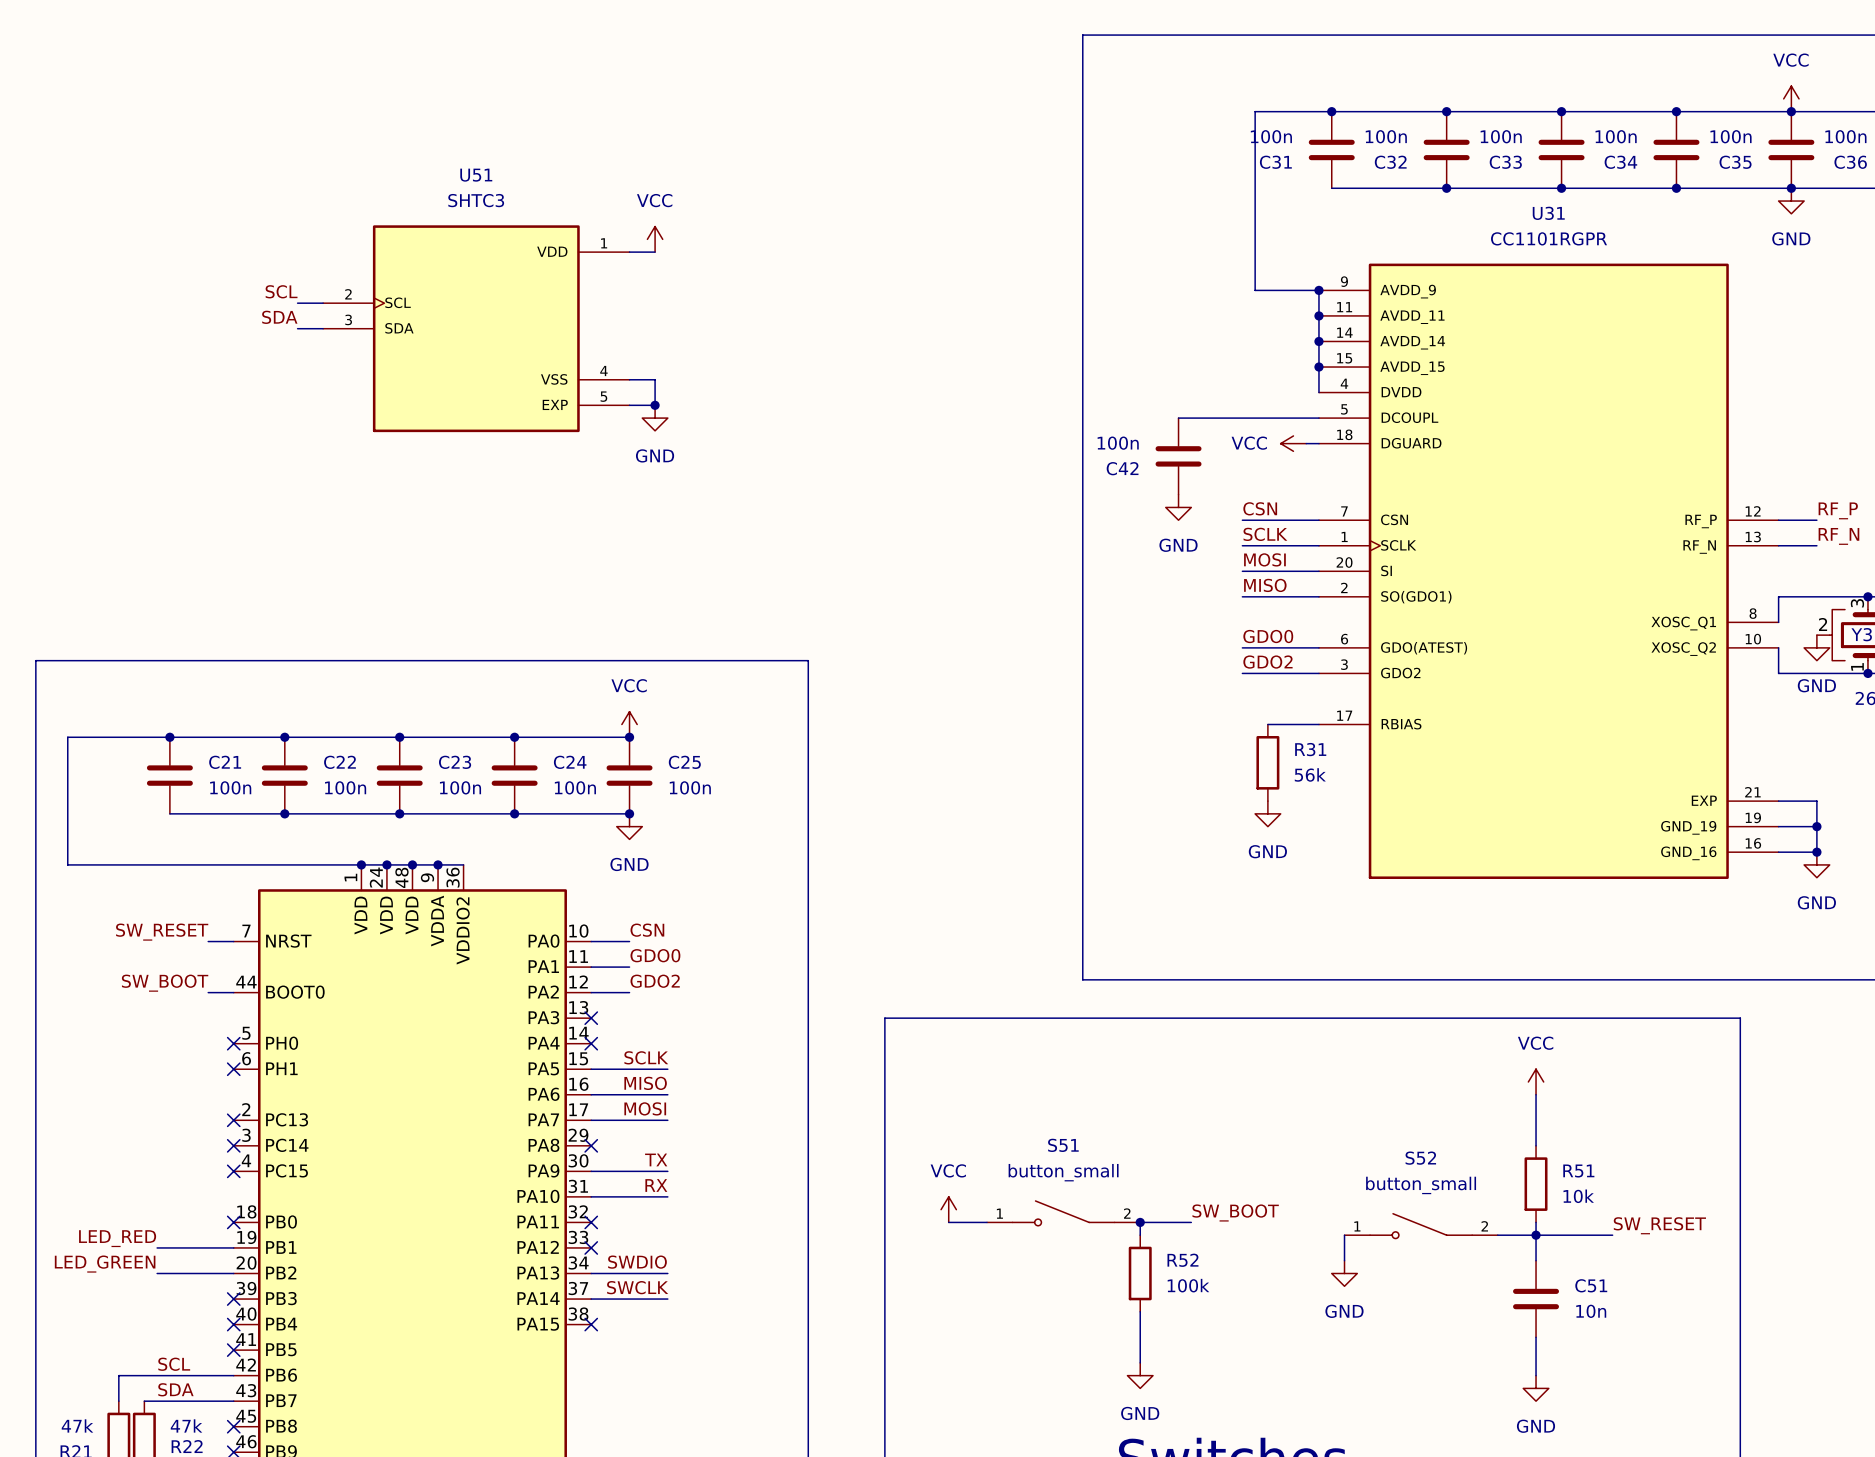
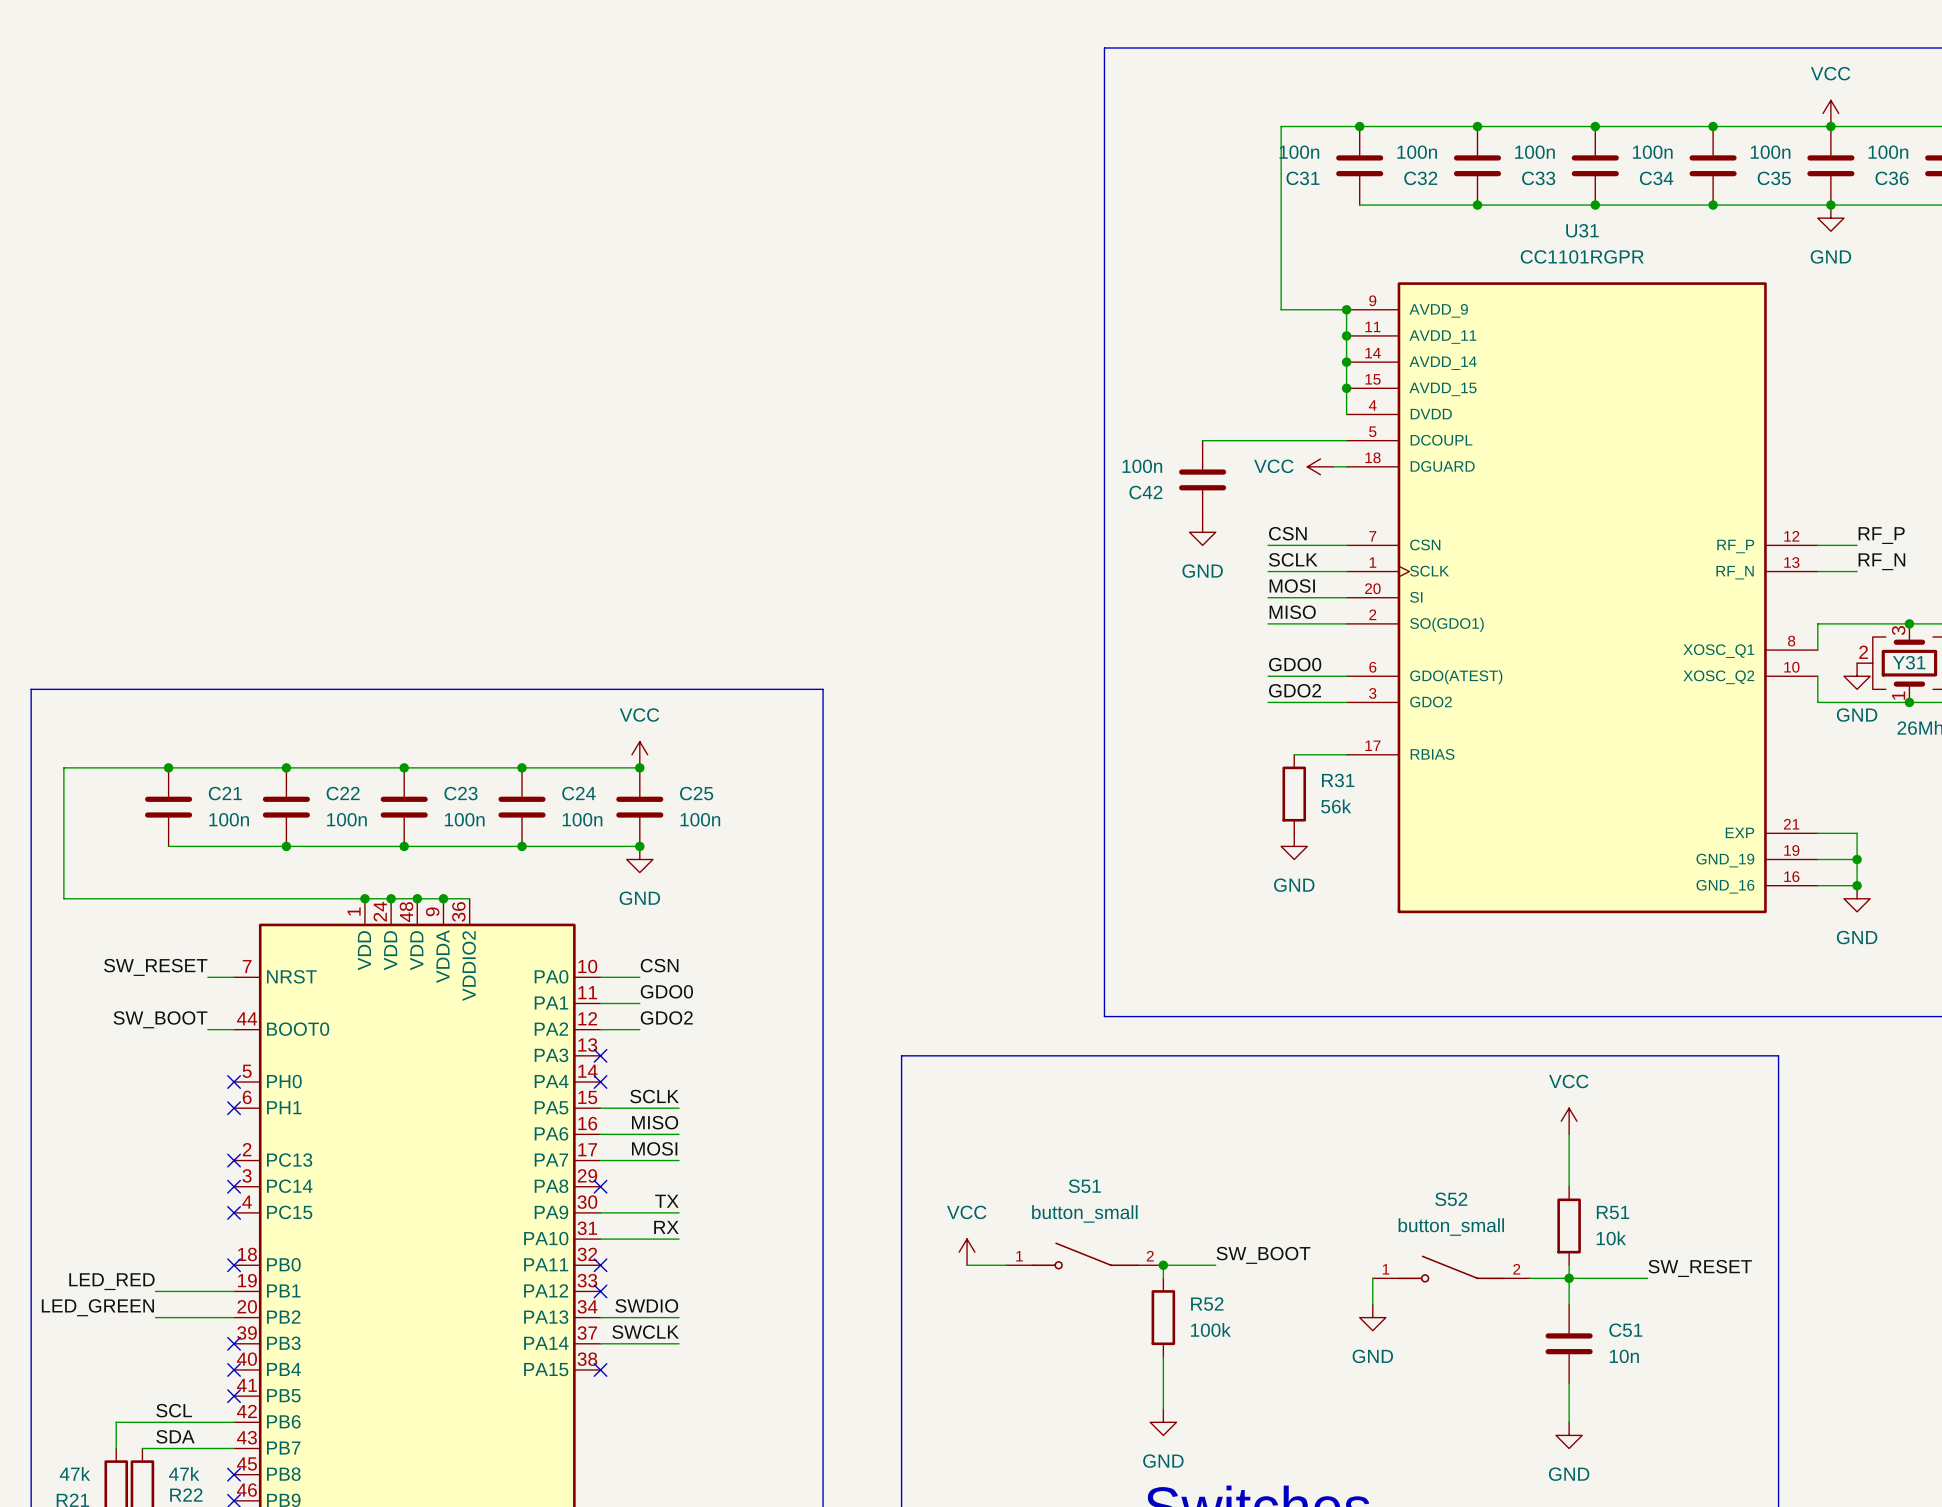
power symbol: VCC (655, 239) -> none
wire: (629, 252) (655, 252) -> none
label: SCL (281, 291) -> none
wire: (297, 303) (323, 303) -> none
label: SDA (279, 317) -> none
wire: (297, 328) (323, 328) -> none
U51: SHTC3 (476, 328) -> none
wire: (629, 379) (655, 379) (655, 405) (629, 405) -> none
junction: (655, 405) -> none
power symbol: GND (655, 418) -> none

